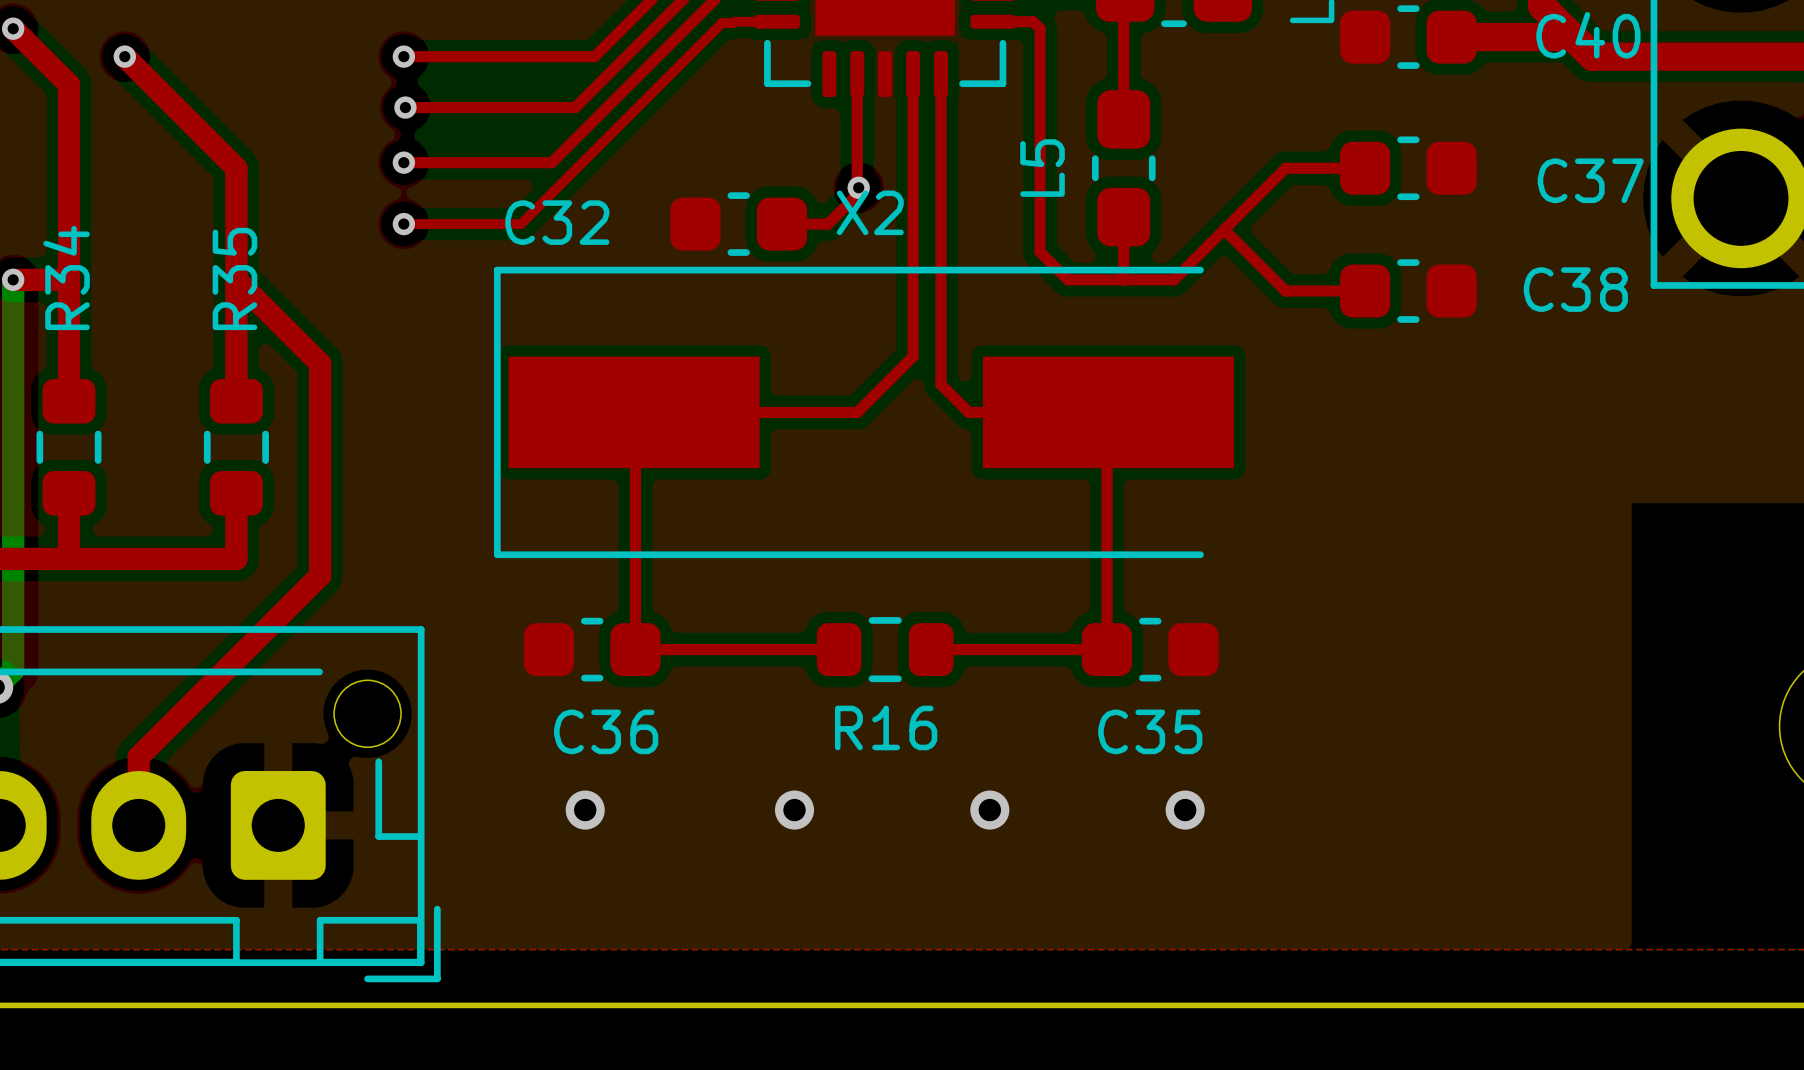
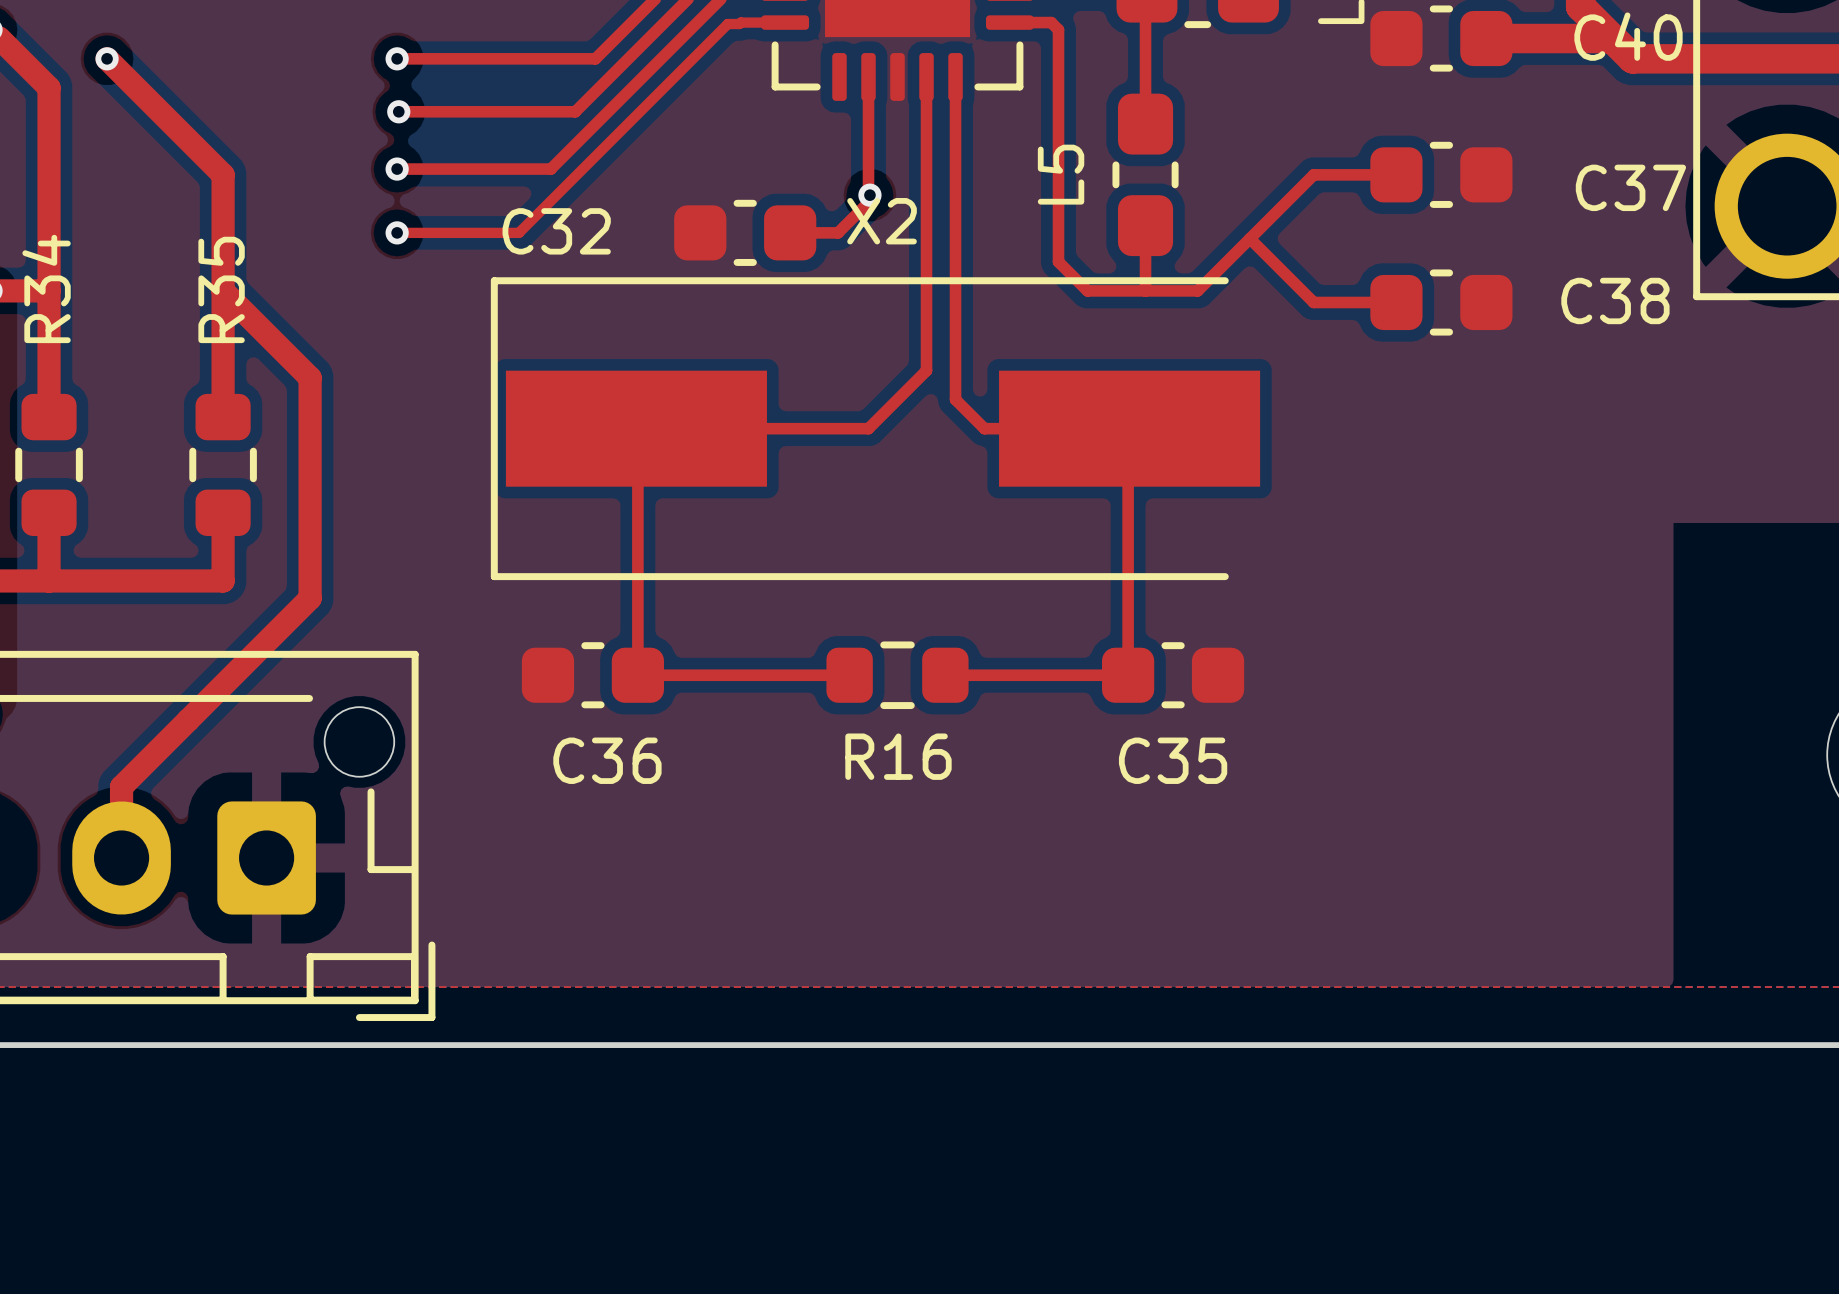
via: (585, 810) -> none
via: (794, 810) -> none
via: (989, 810) -> none
via: (1185, 810) -> none

